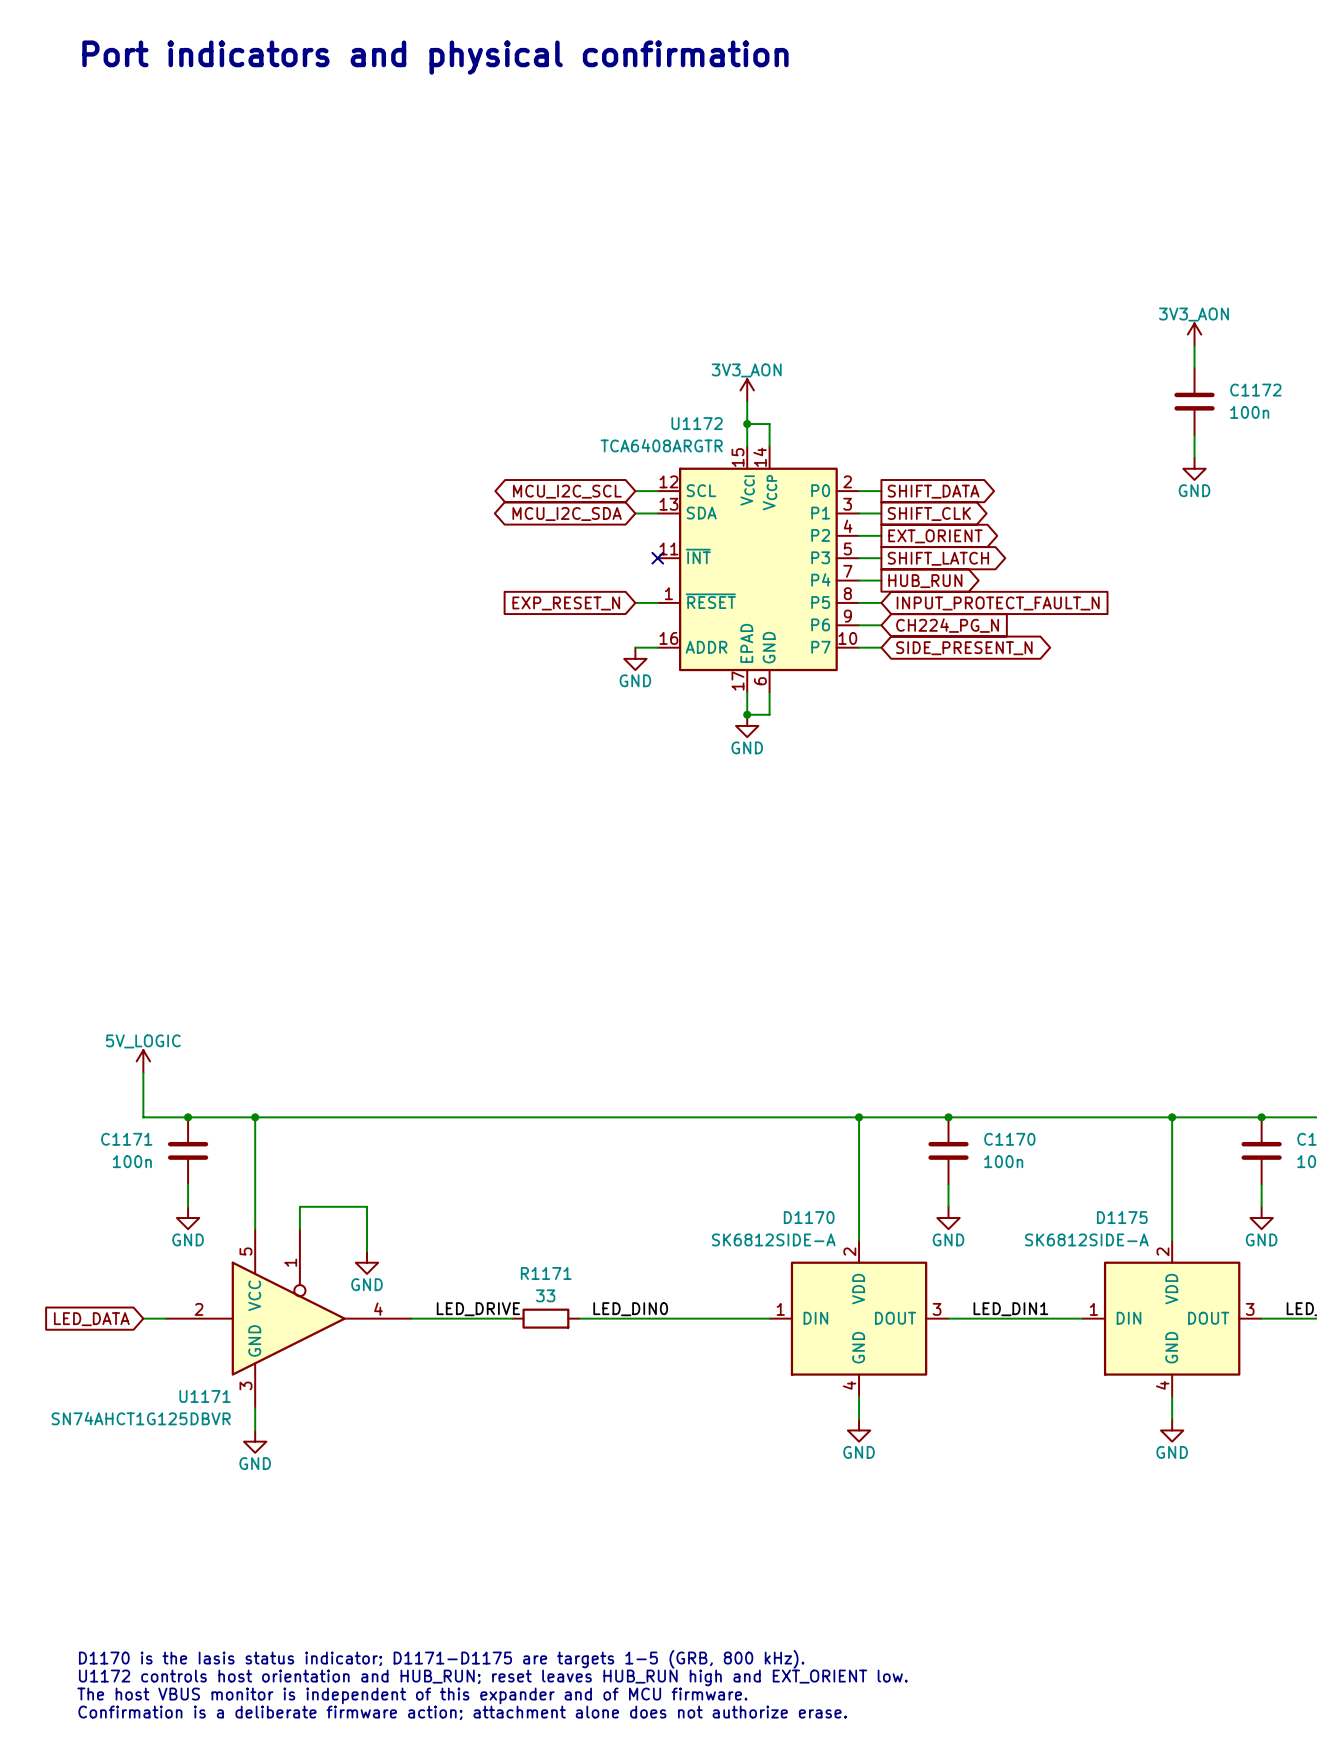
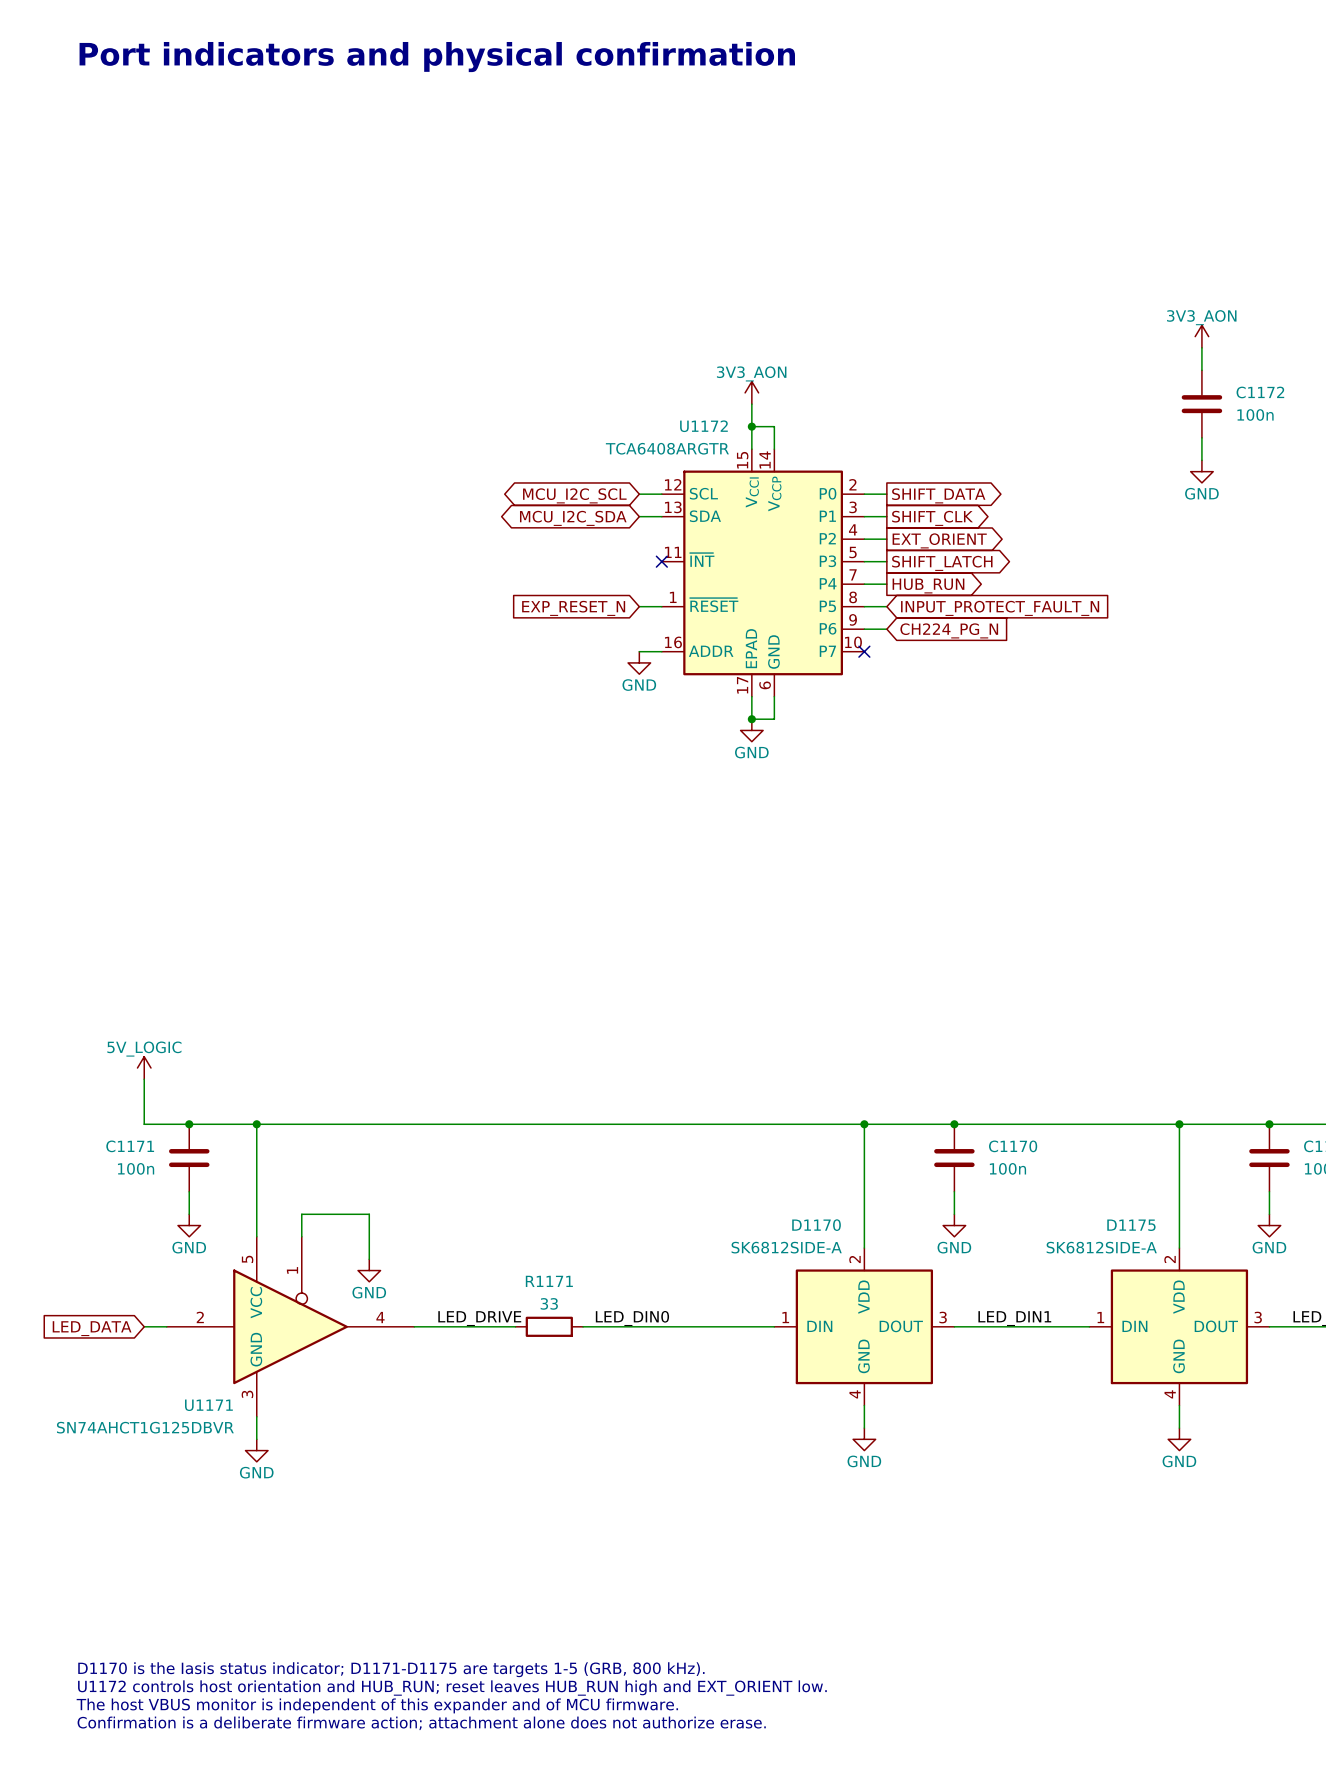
wire: (859, 647) (881, 647) -> none
no-connect mark: none -> (864, 651)
global label: SIDE_PRESENT_N (964, 648) -> none

